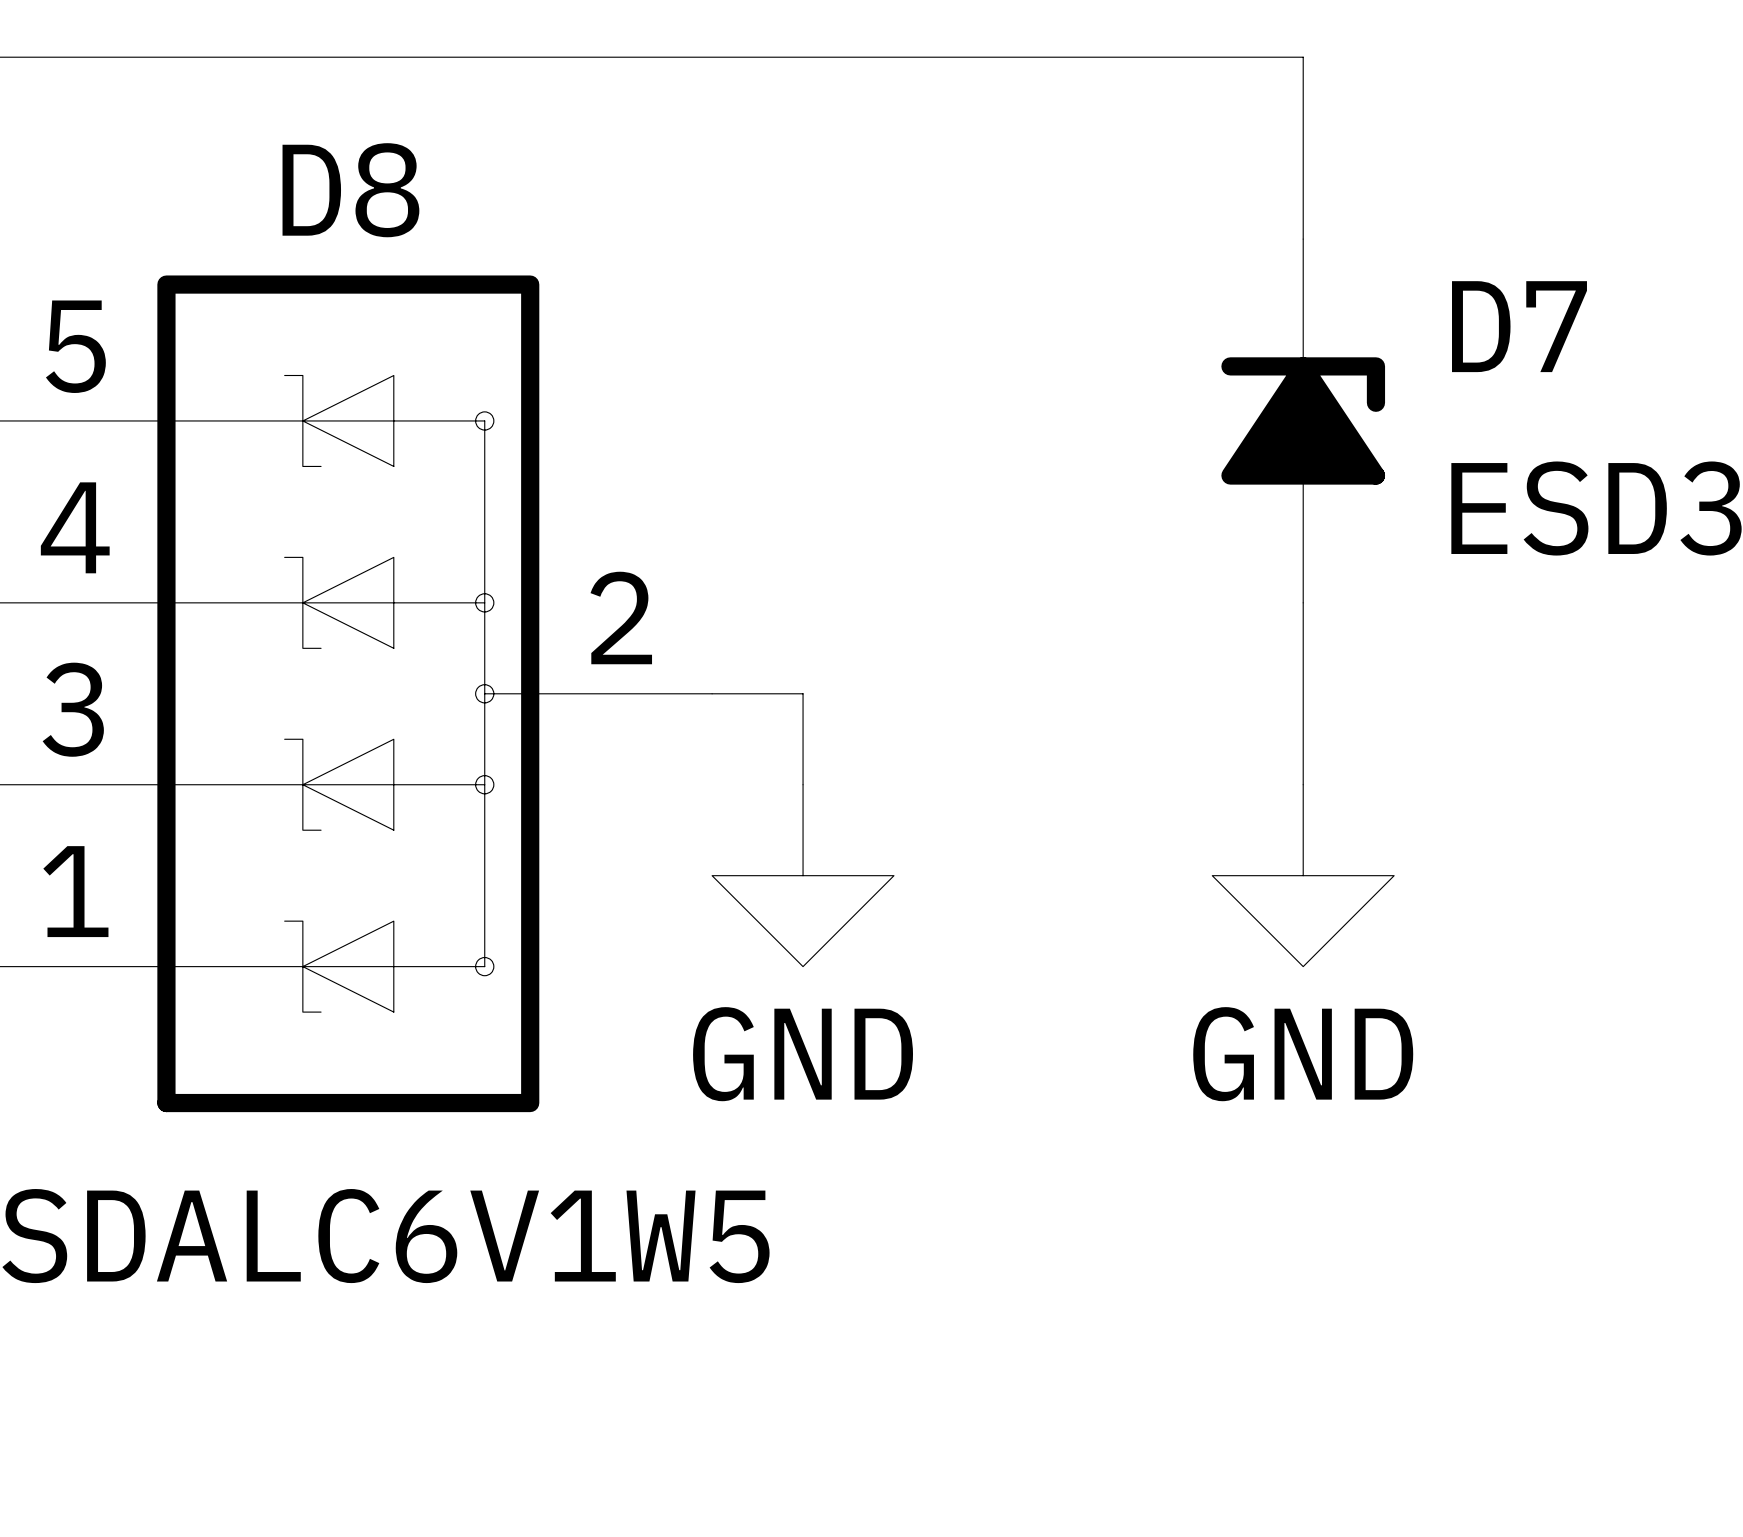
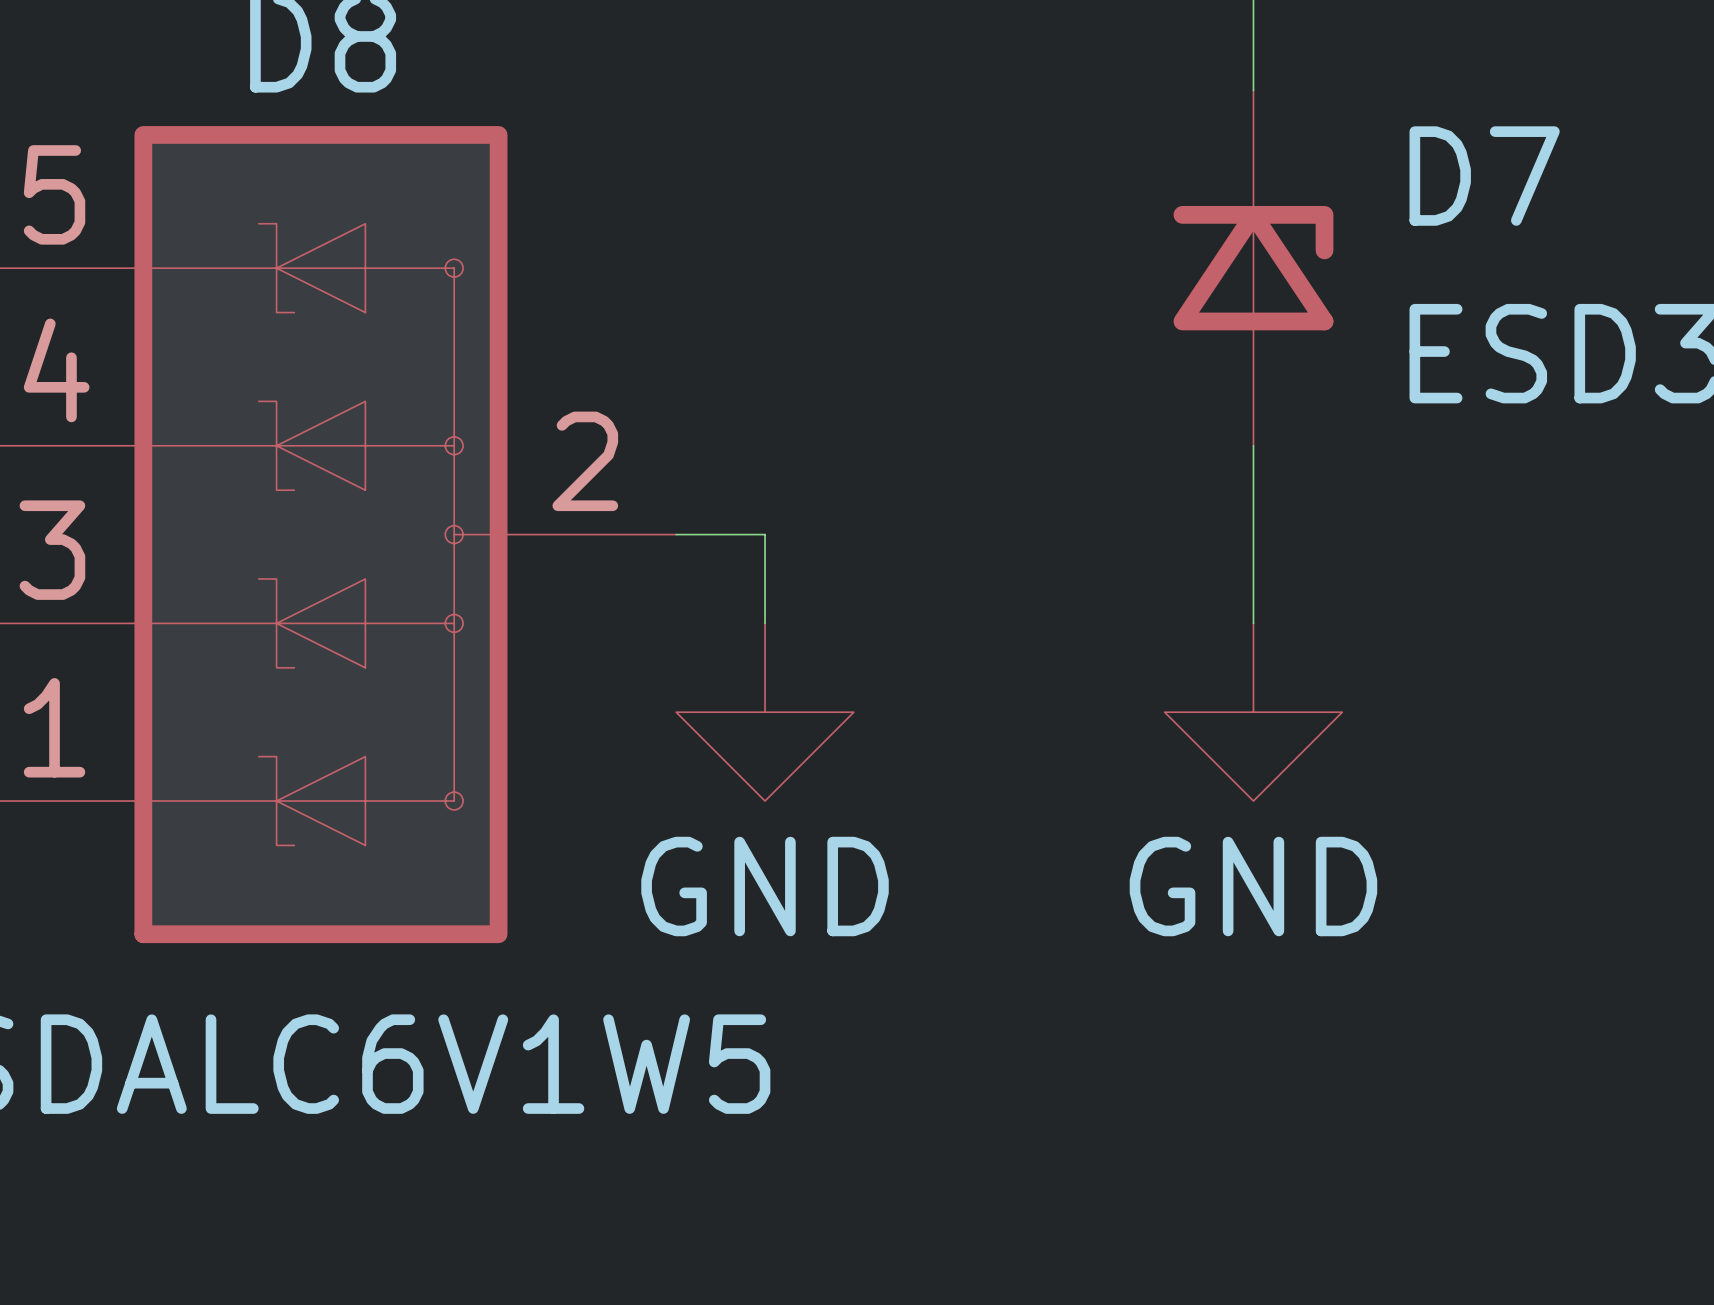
D7 symbol: [1221, 239, 1386, 603] -> [1173, 90, 1334, 446]

